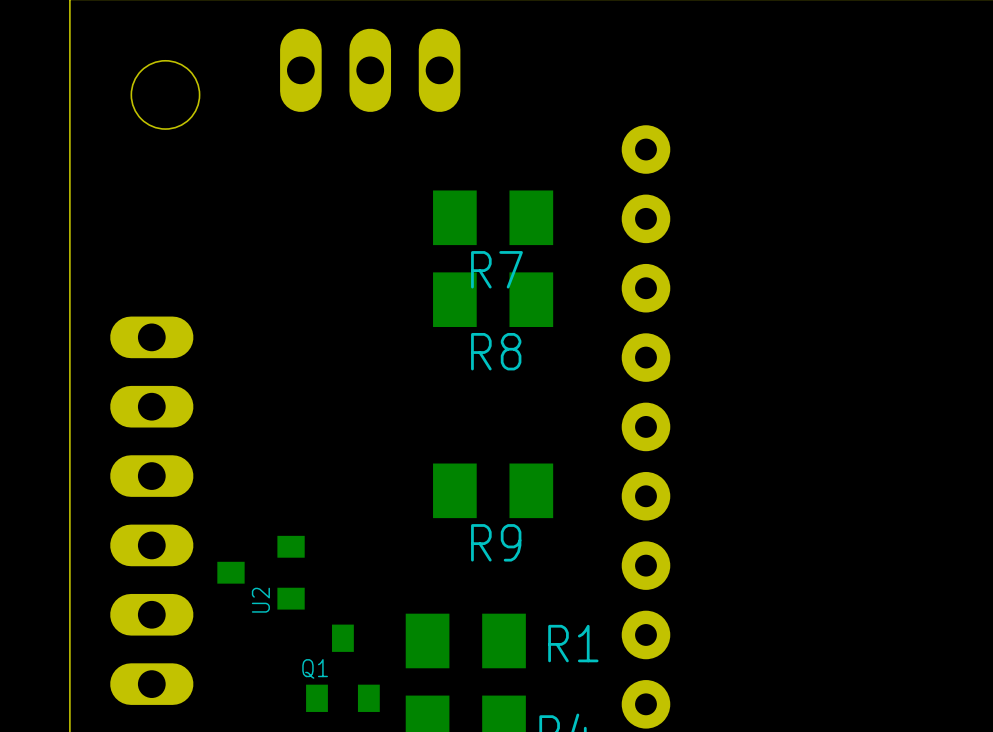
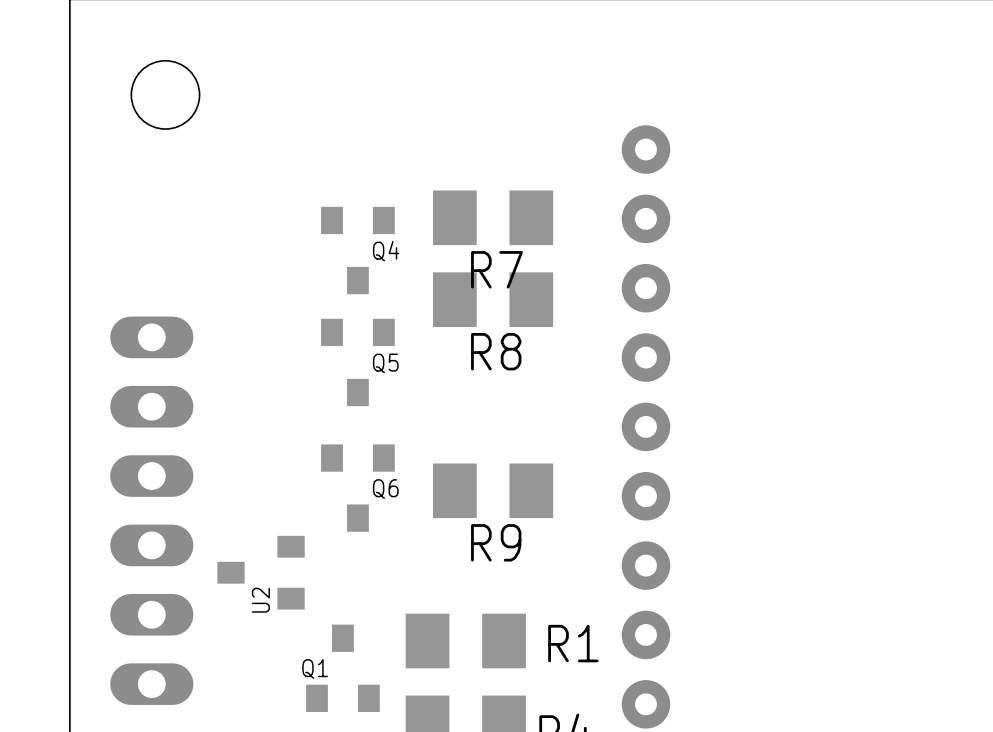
part: (370, 70) -> none
Q4: none -> (357, 250)
Q5: none -> (357, 362)
Q6: none -> (357, 488)

